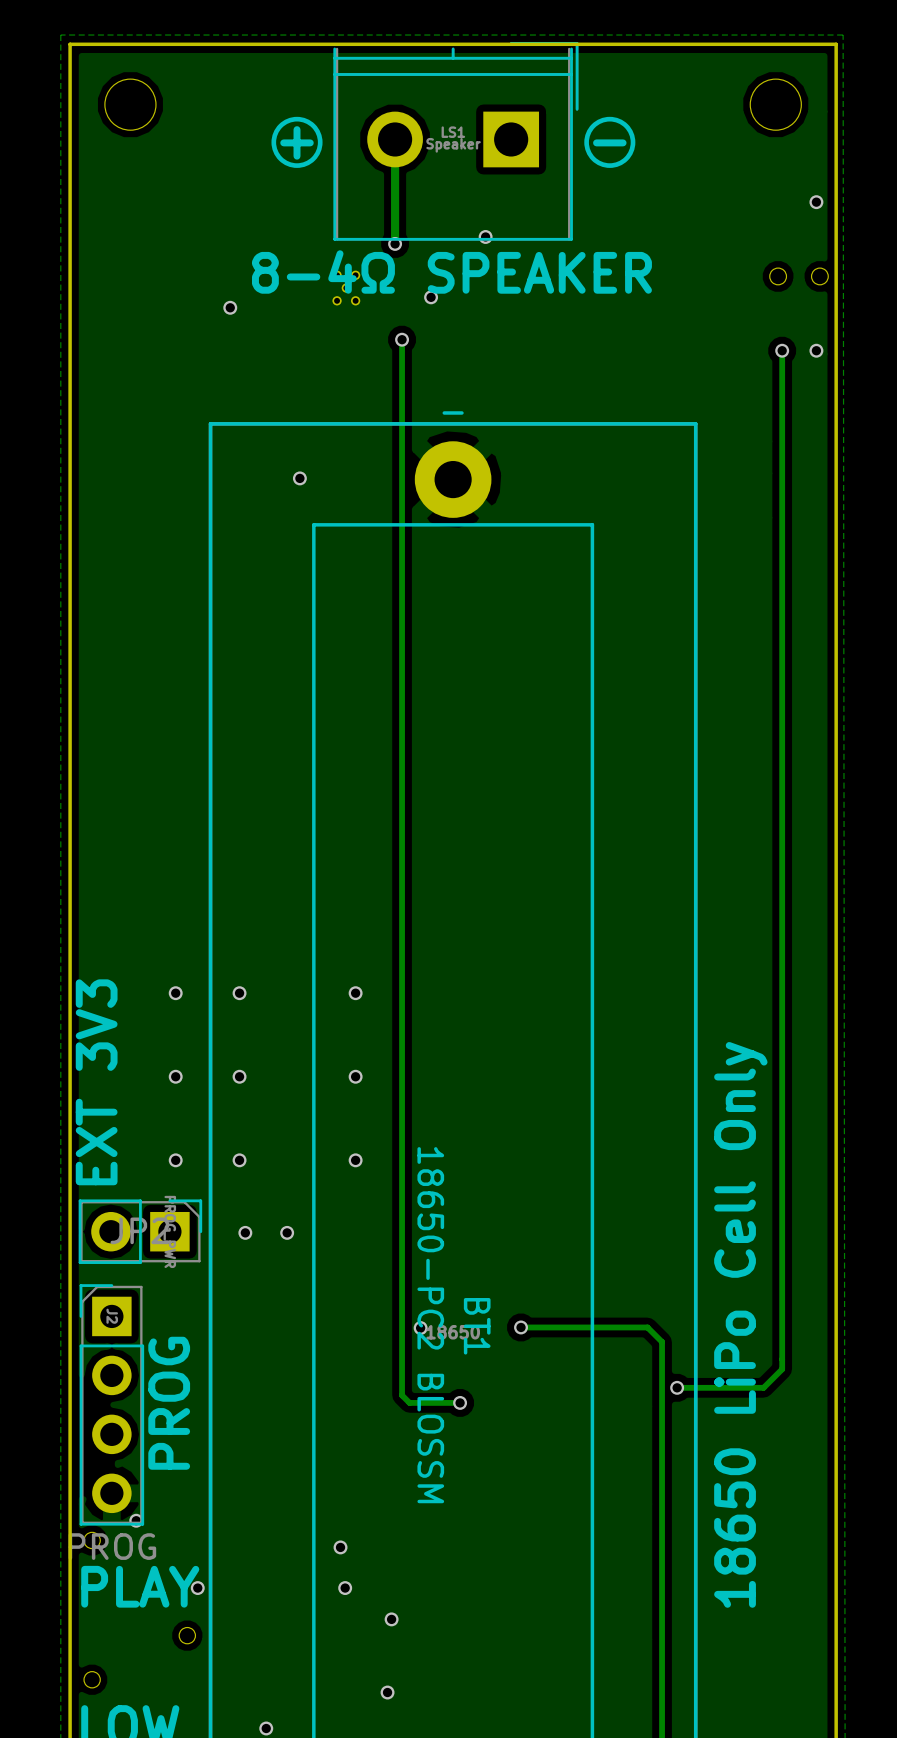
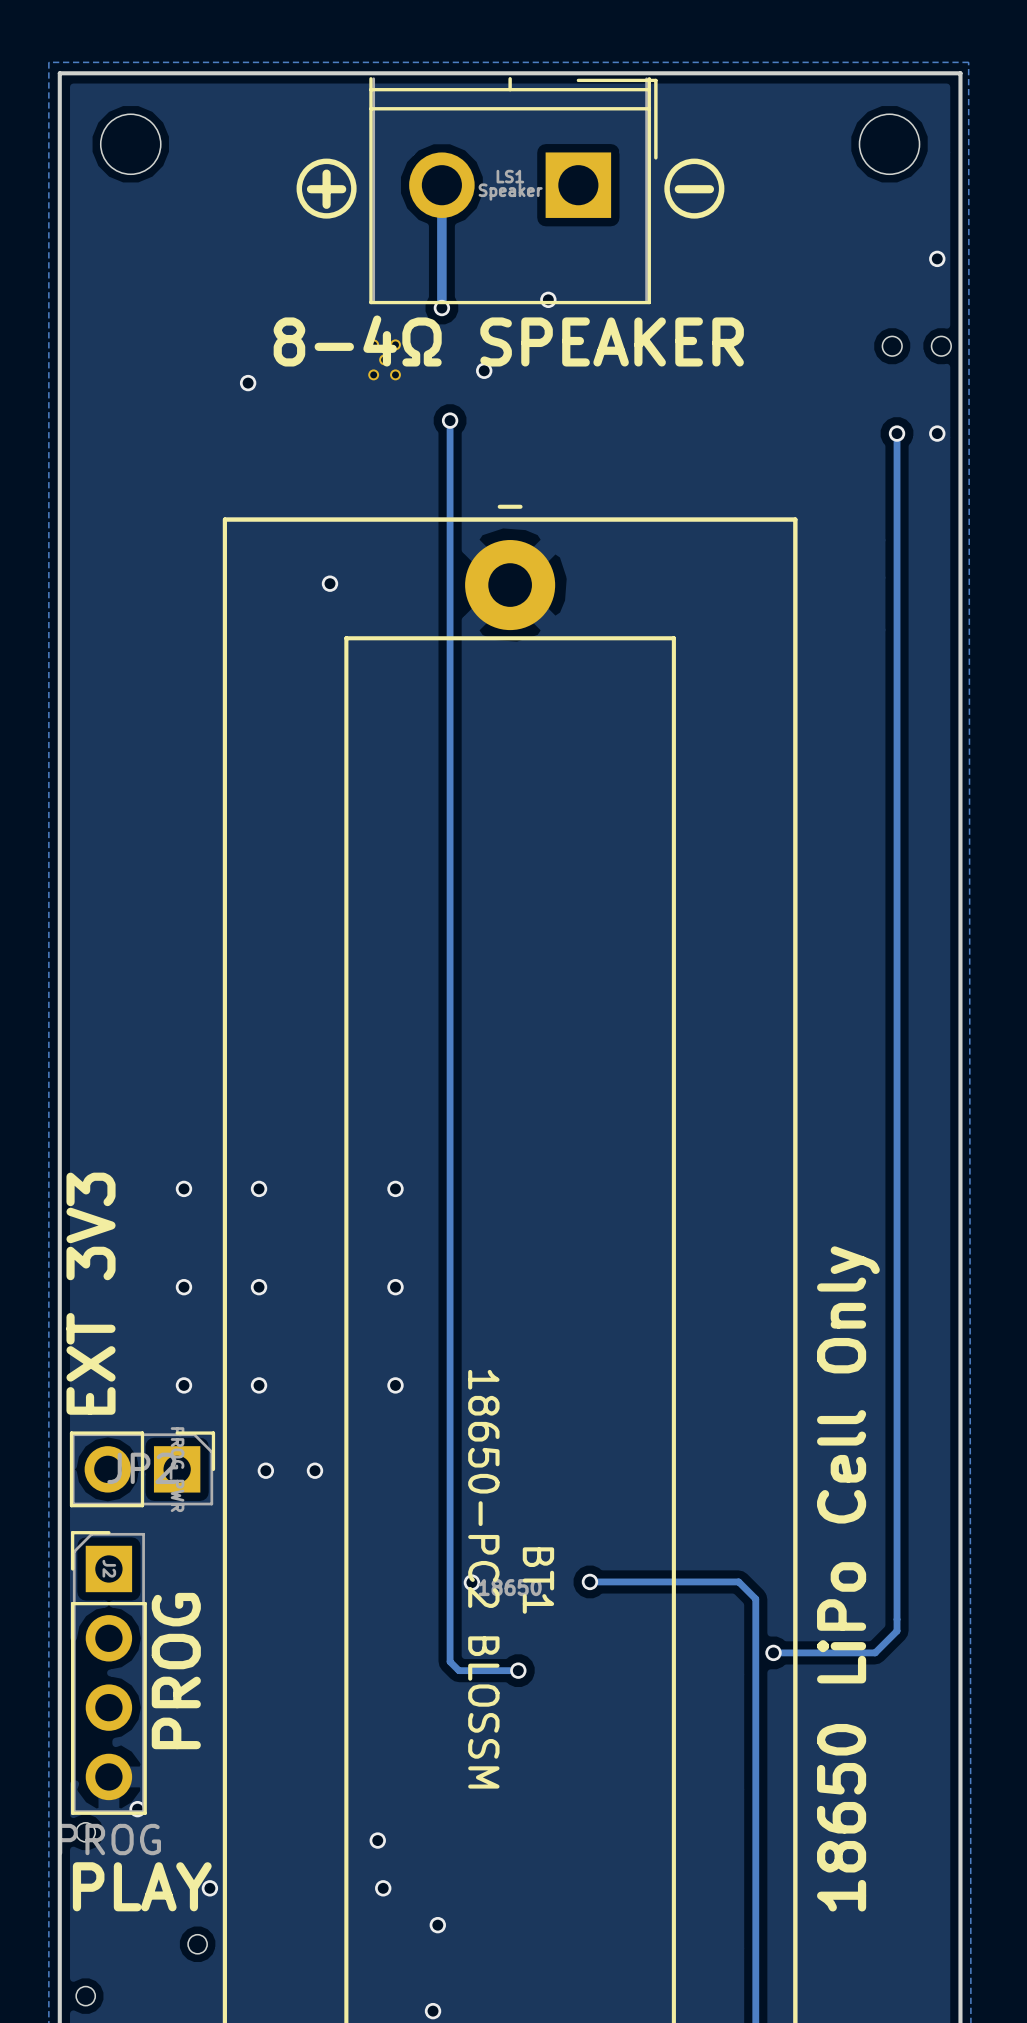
LS1 footprint: [333, 41, 579, 241] -> [369, 77, 658, 305]

